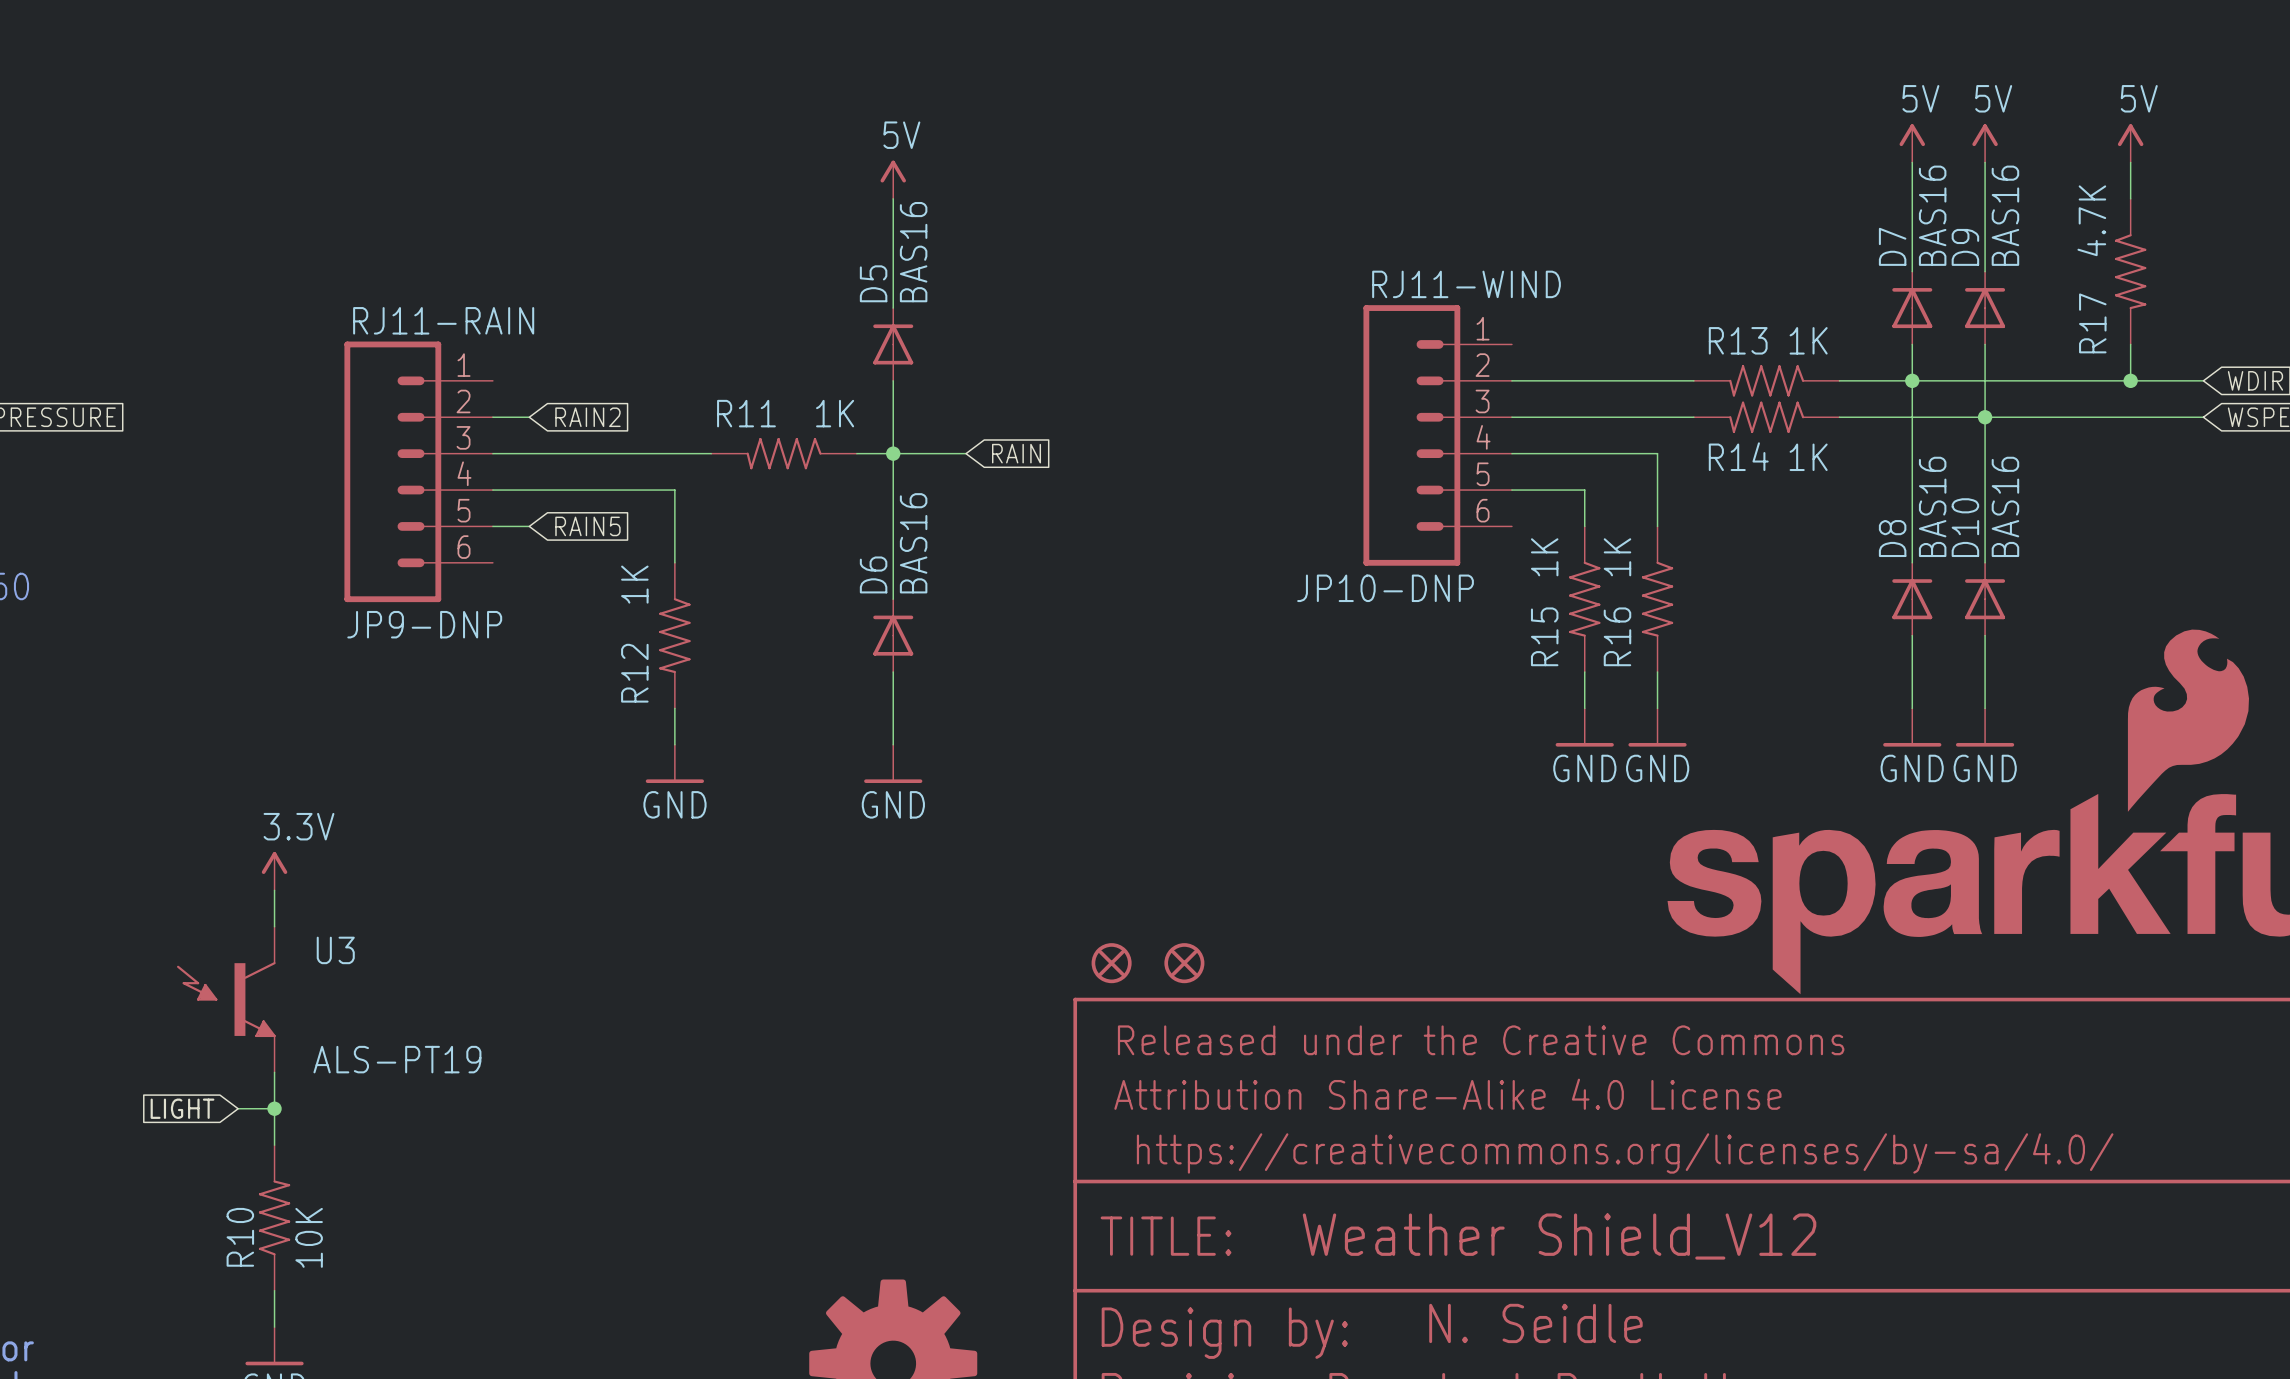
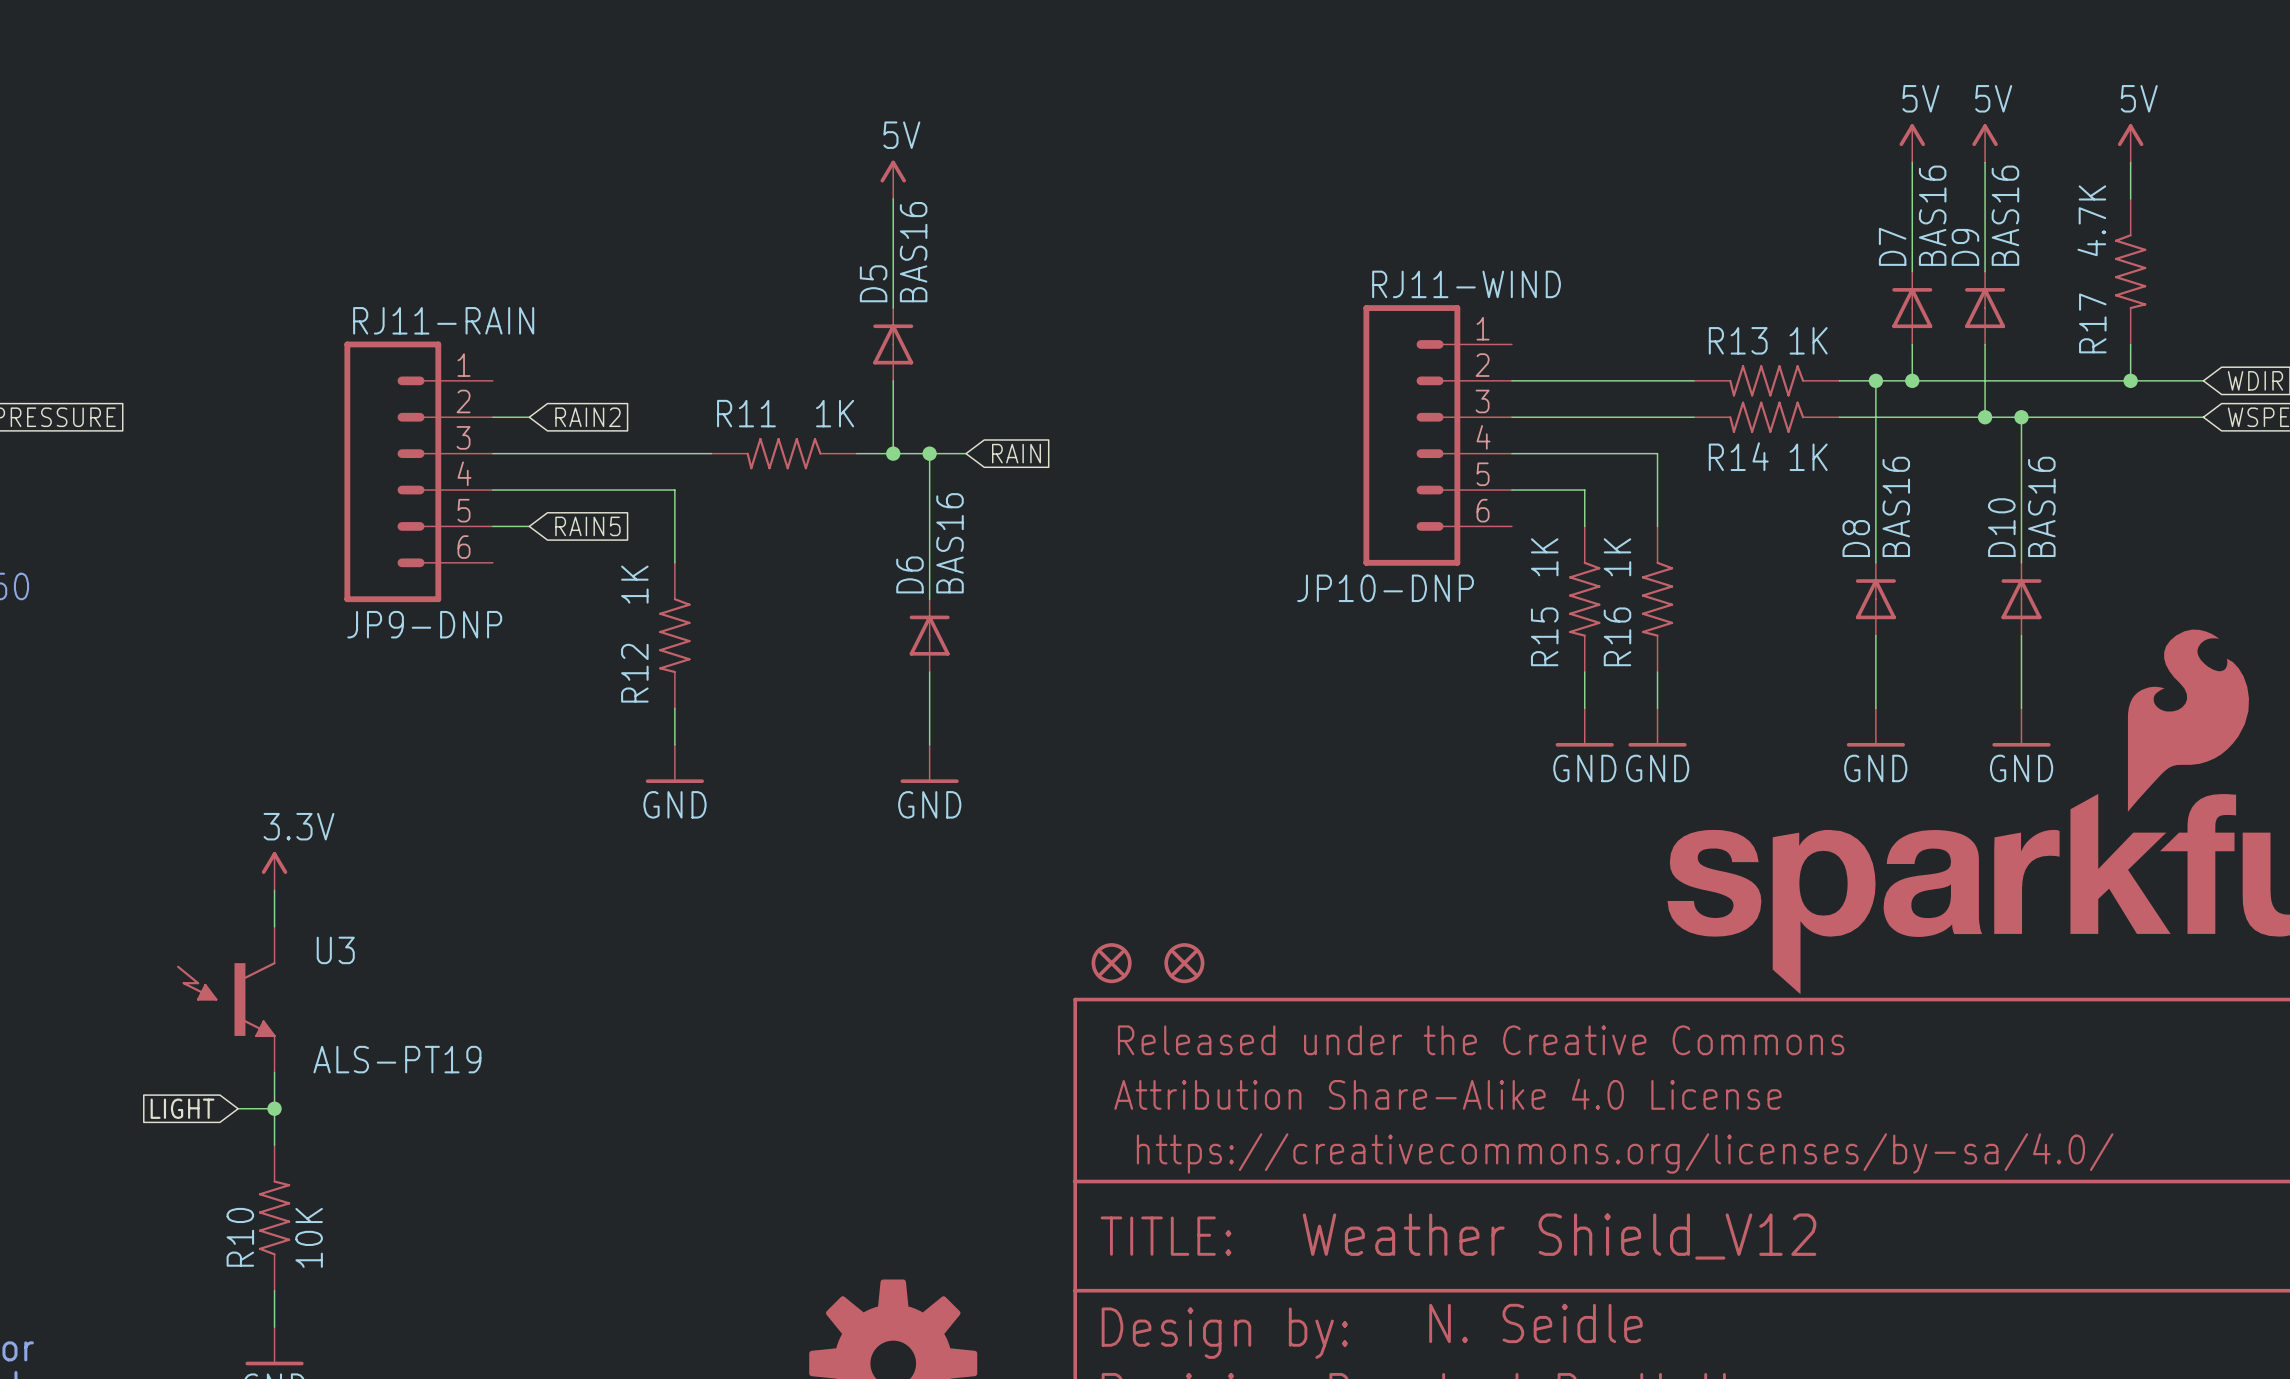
junction: none -> (1875, 380)
wire: (1912, 380) (1912, 562) -> (1875, 380) (1875, 562)
wire: (1985, 417) (1985, 562) -> (2021, 417) (2021, 562)
junction: none -> (2021, 417)
wire: (893, 453) (893, 599) -> (929, 453) (929, 599)
junction: none -> (929, 453)
D8 position: (1912, 599) -> (1875, 599)
D10 position: (1985, 599) -> (2021, 599)
D6 position: (893, 635) -> (929, 635)
wire: (1912, 635) (1912, 708) -> (1875, 635) (1875, 708)
wire: (1985, 635) (1985, 708) -> (2021, 635) (2021, 708)
wire: (893, 672) (893, 744) -> (929, 672) (929, 744)
power symbol position: GND (1912, 727) -> GND (1875, 727)
power symbol position: GND (1985, 727) -> GND (2021, 727)
power symbol position: GND (893, 763) -> GND (929, 763)

